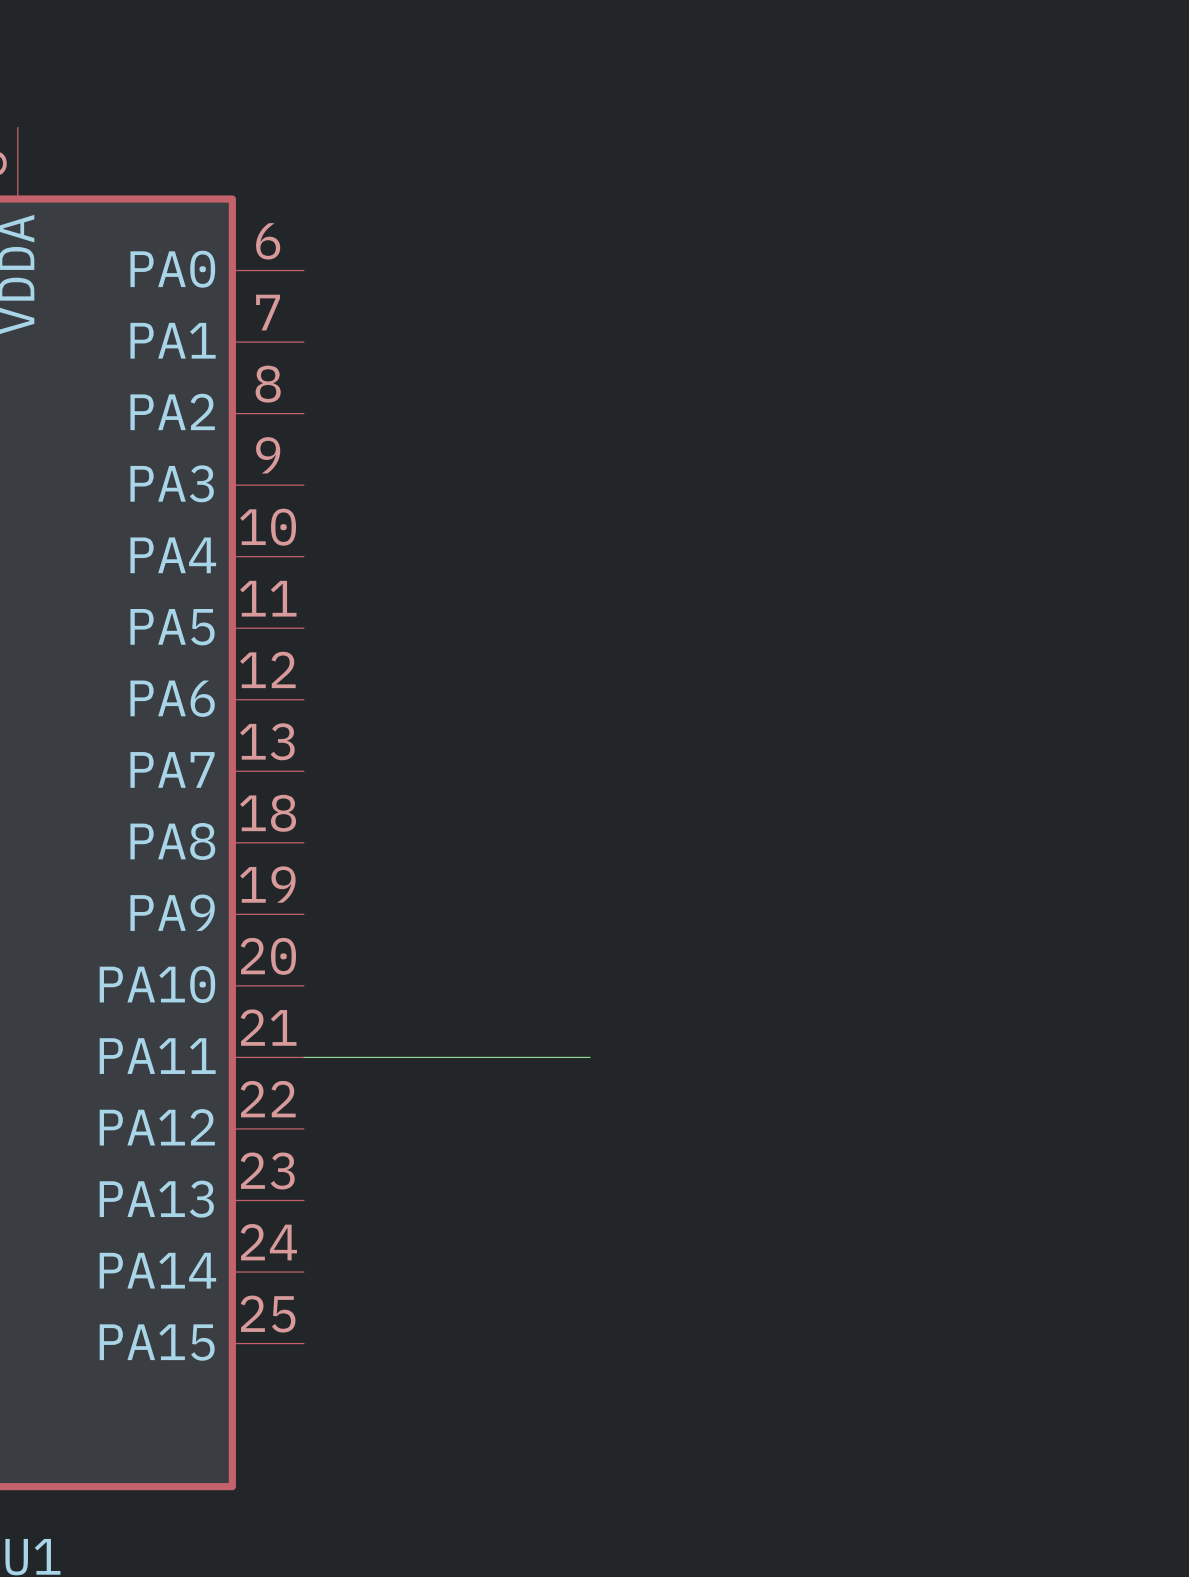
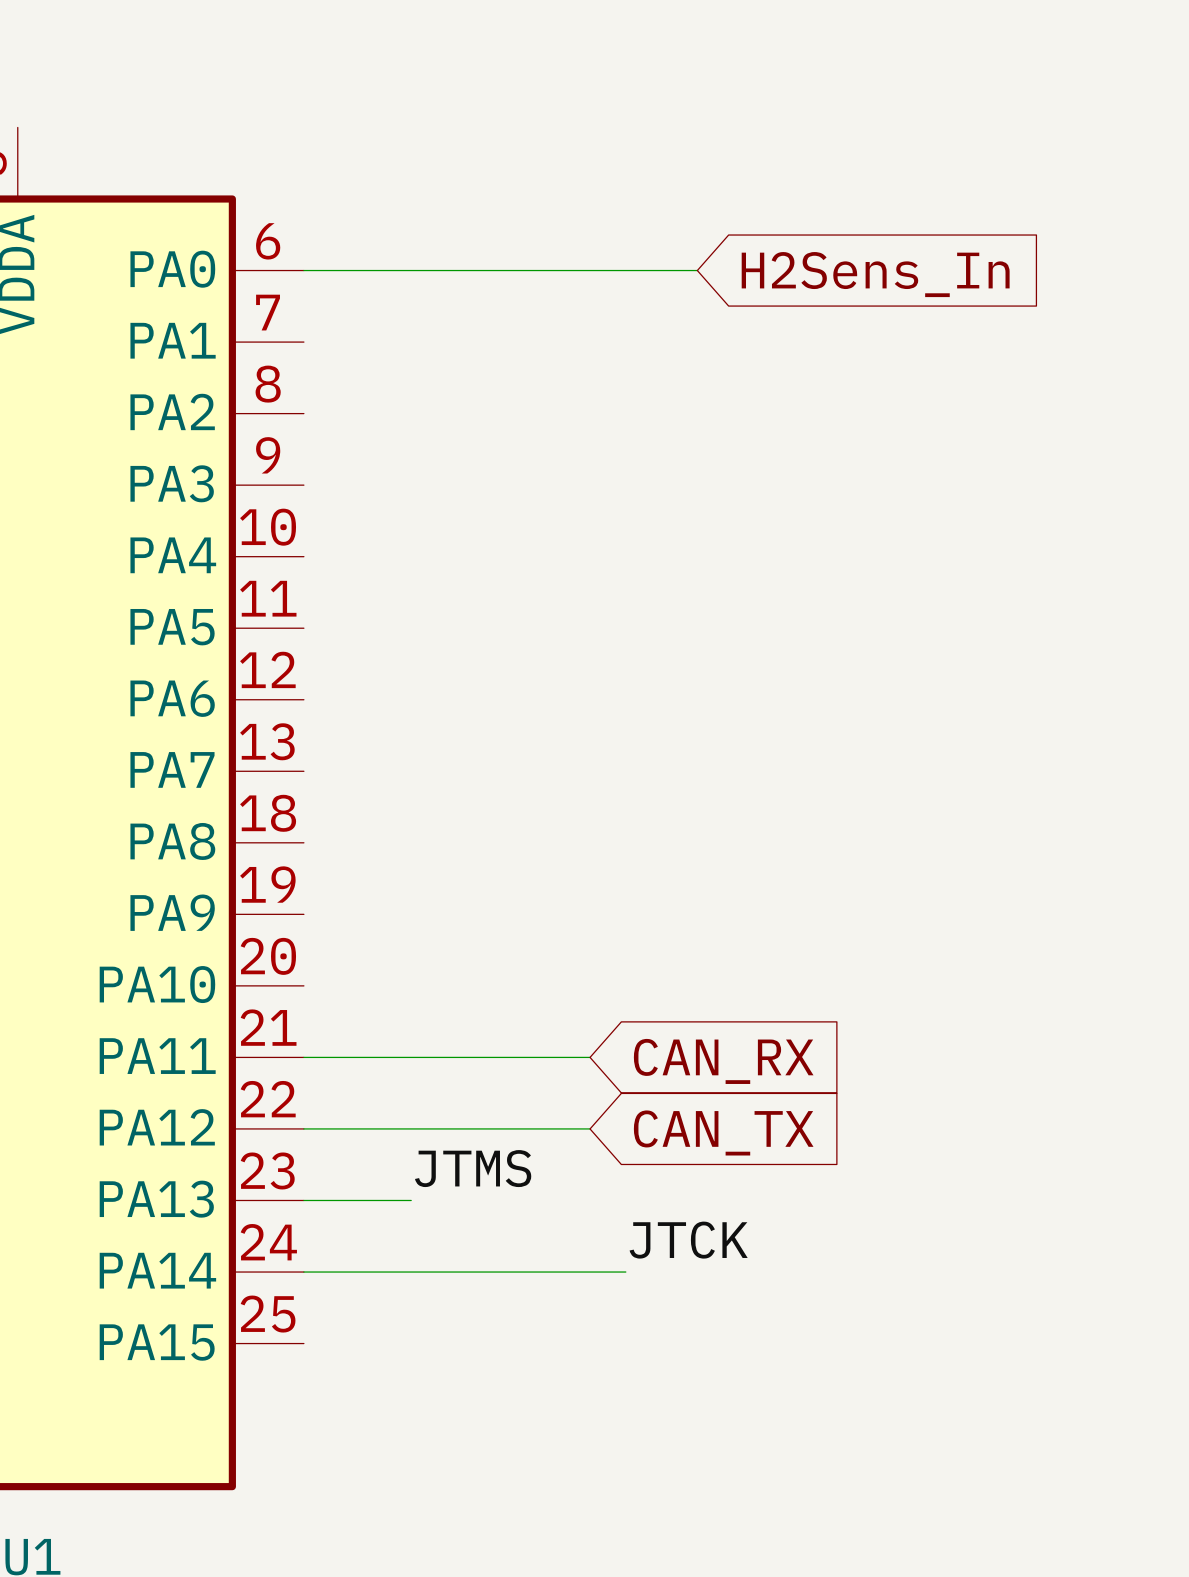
wire: none -> (303, 270) (697, 270)
global label: none -> H2Sens_In (875, 274)
global label: none -> CAN_RX (723, 1061)
wire: none -> (303, 1128) (590, 1128)
global label: none -> CAN_TX (723, 1132)
label: none -> JTMS (473, 1168)
wire: none -> (303, 1200) (411, 1200)
label: none -> JTCK (688, 1240)
wire: none -> (303, 1272) (625, 1272)

